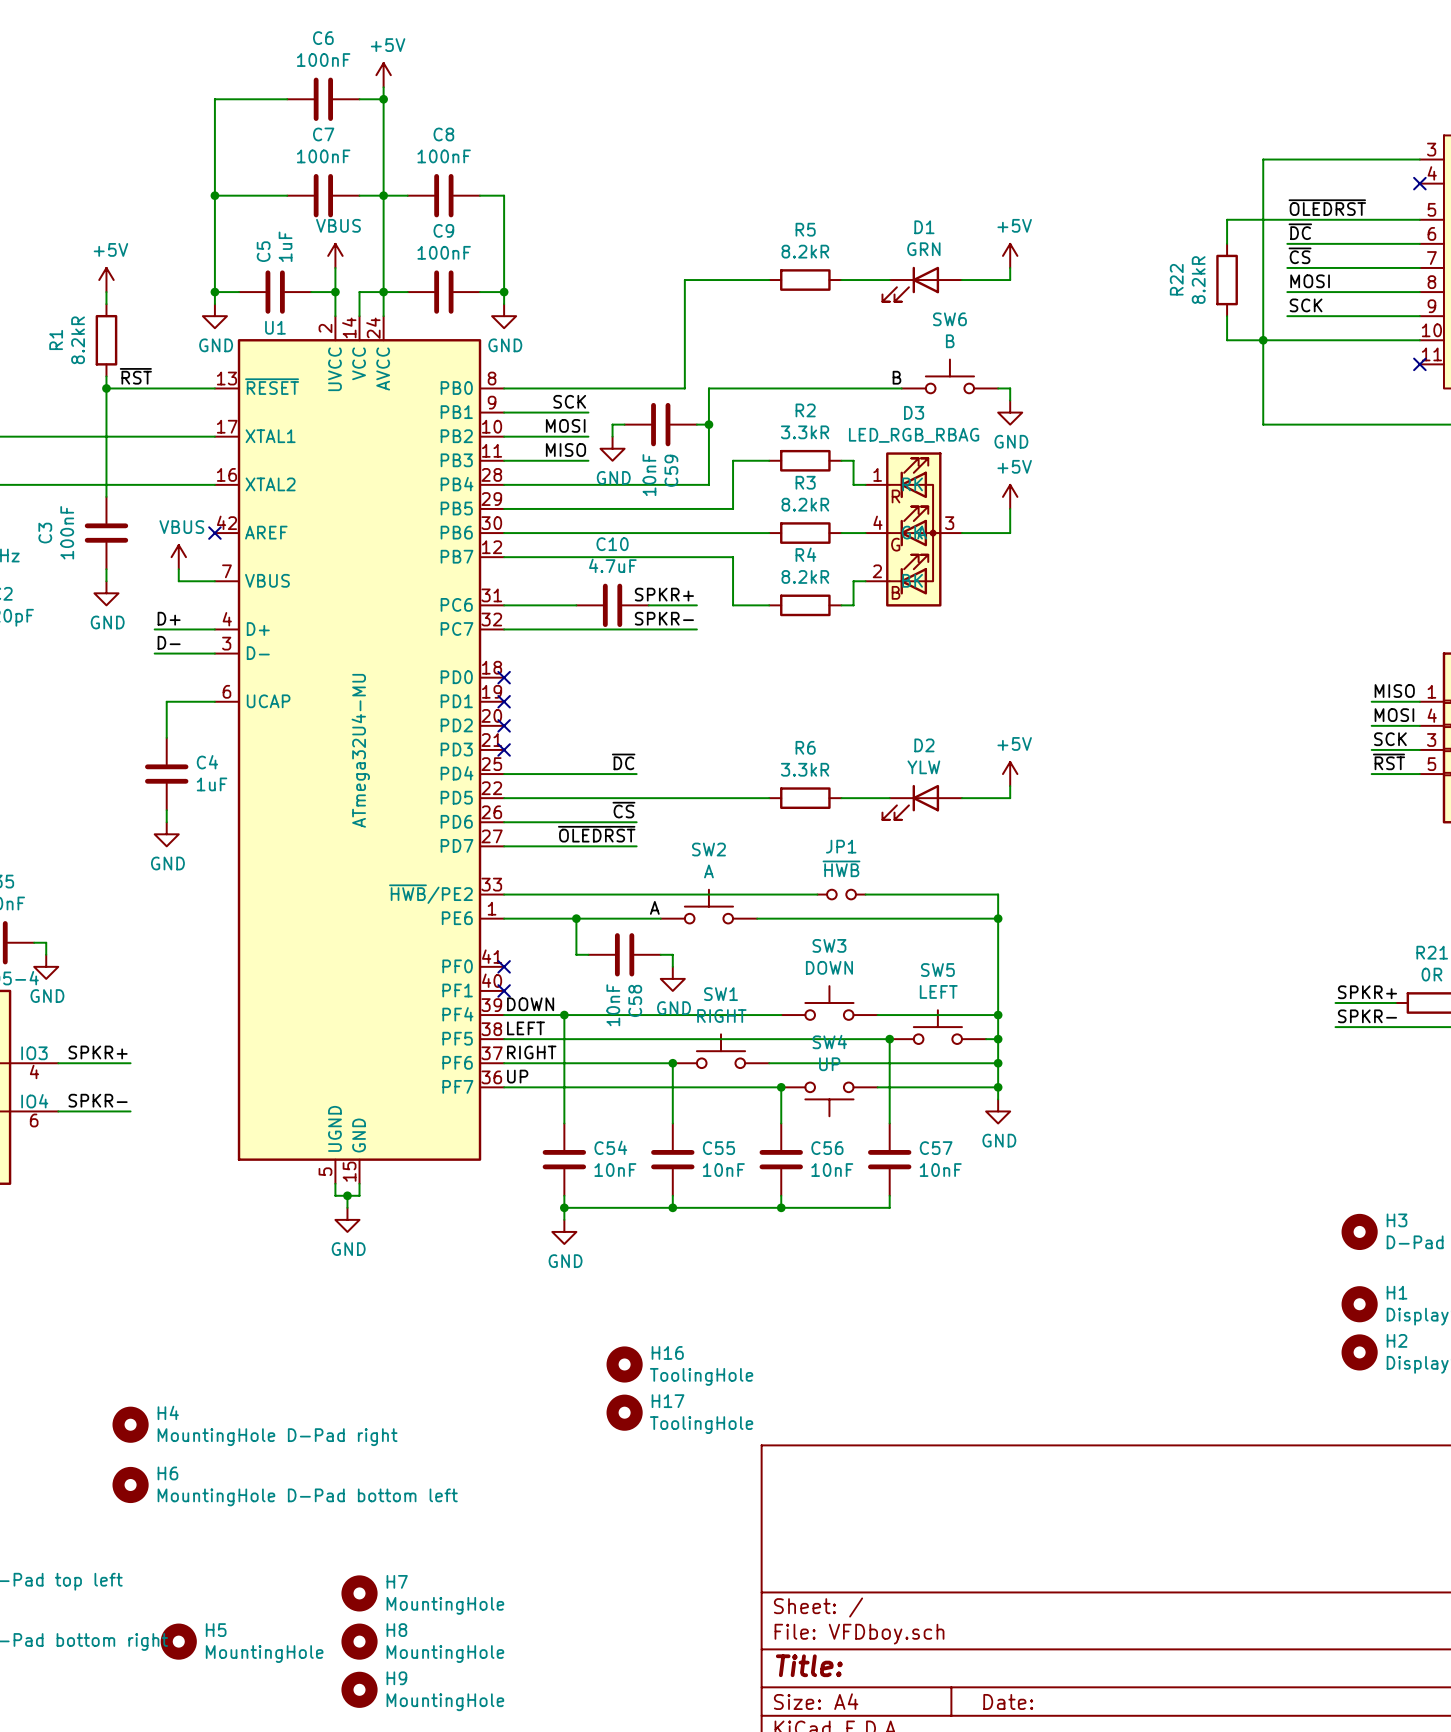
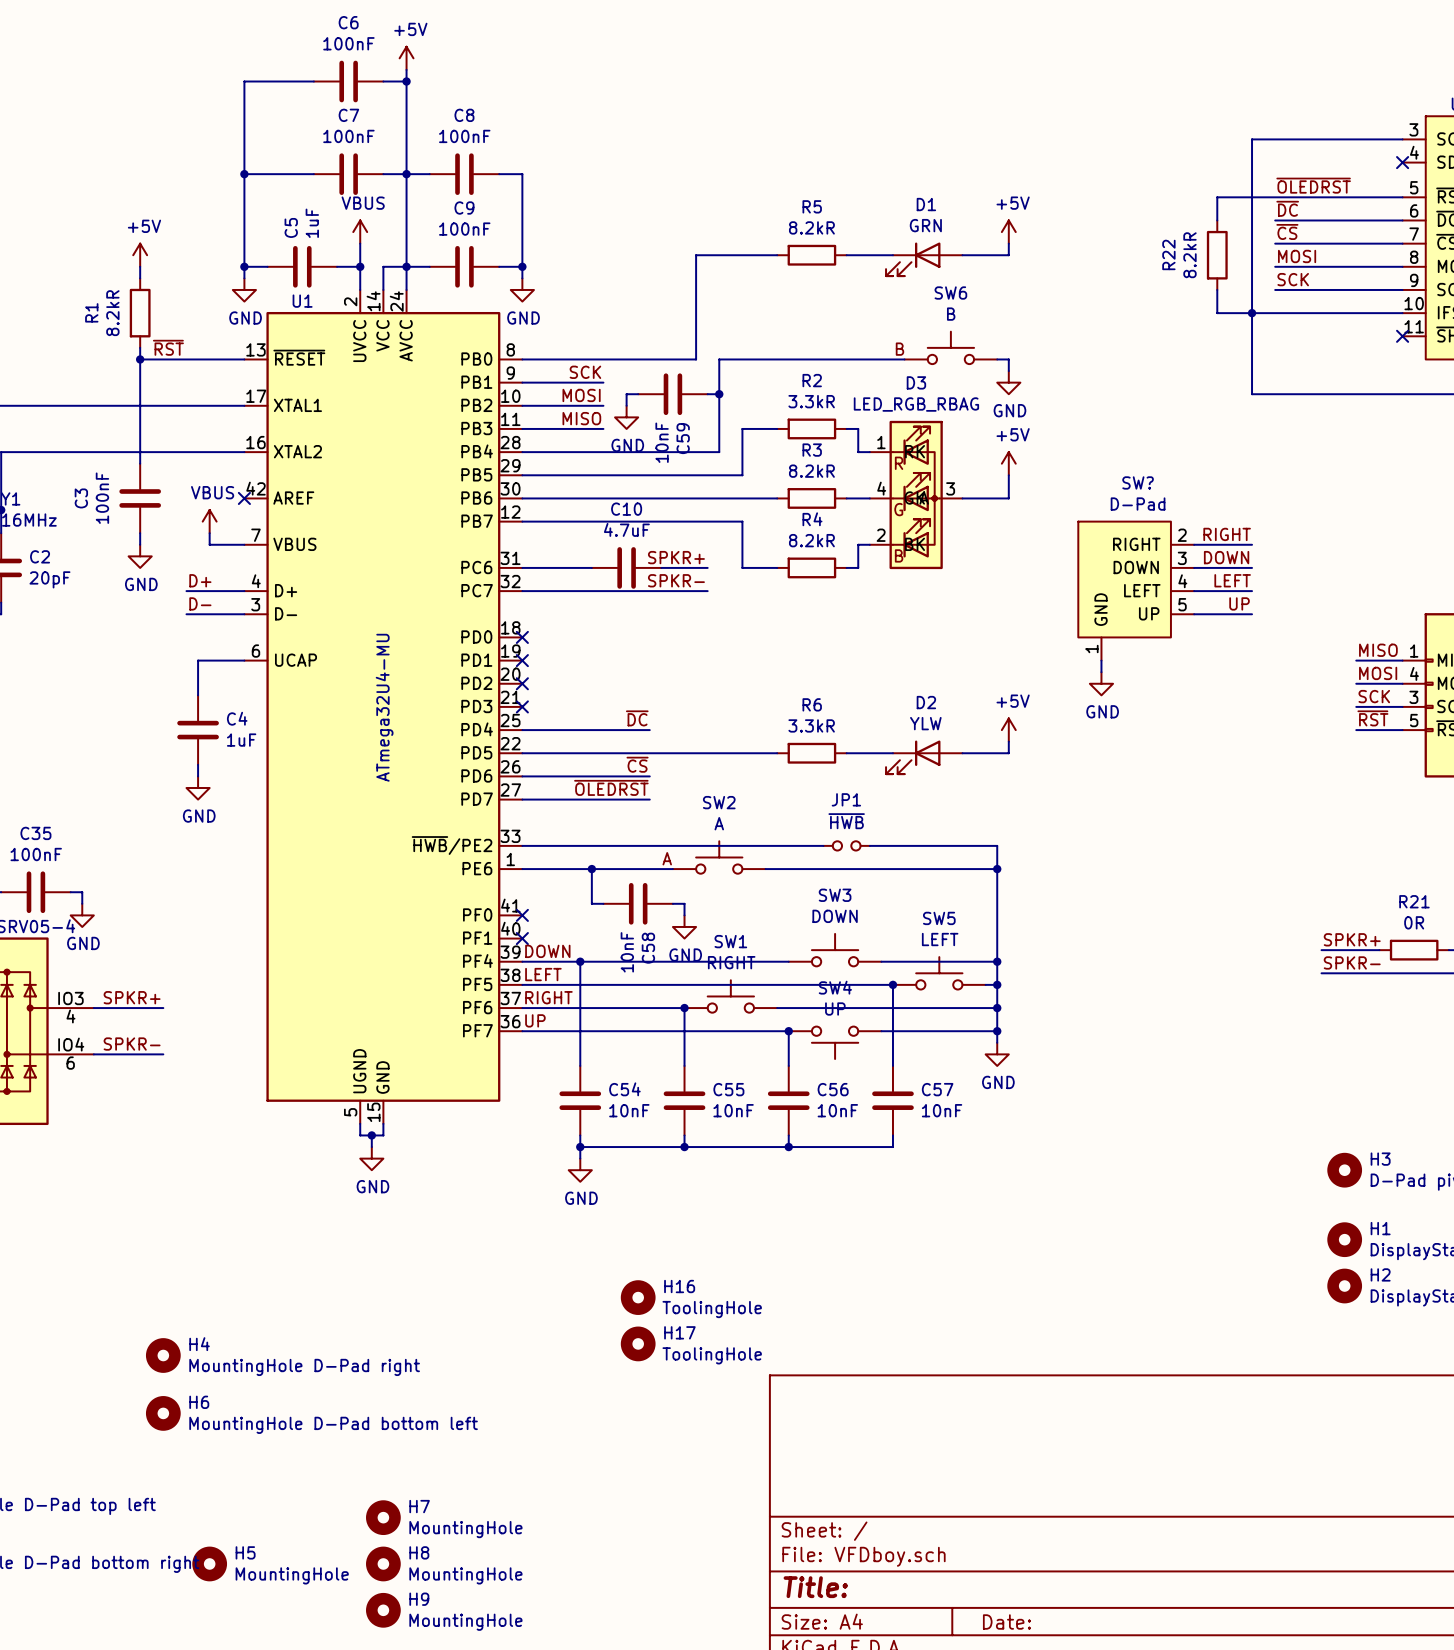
label: none -> RIGHT (1227, 534)
wire: none -> (1194, 544) (1252, 544)
label: none -> DOWN (1226, 557)
wire: none -> (1194, 567) (1252, 567)
label: none -> LEFT (1232, 580)
SW?: none -> D-Pad (1136, 591)
wire: none -> (1194, 591) (1252, 591)
label: none -> UP (1239, 603)
wire: none -> (1194, 614) (1252, 614)
wire: none -> (1101, 660) (1101, 672)
power symbol: none -> GND (1101, 683)

